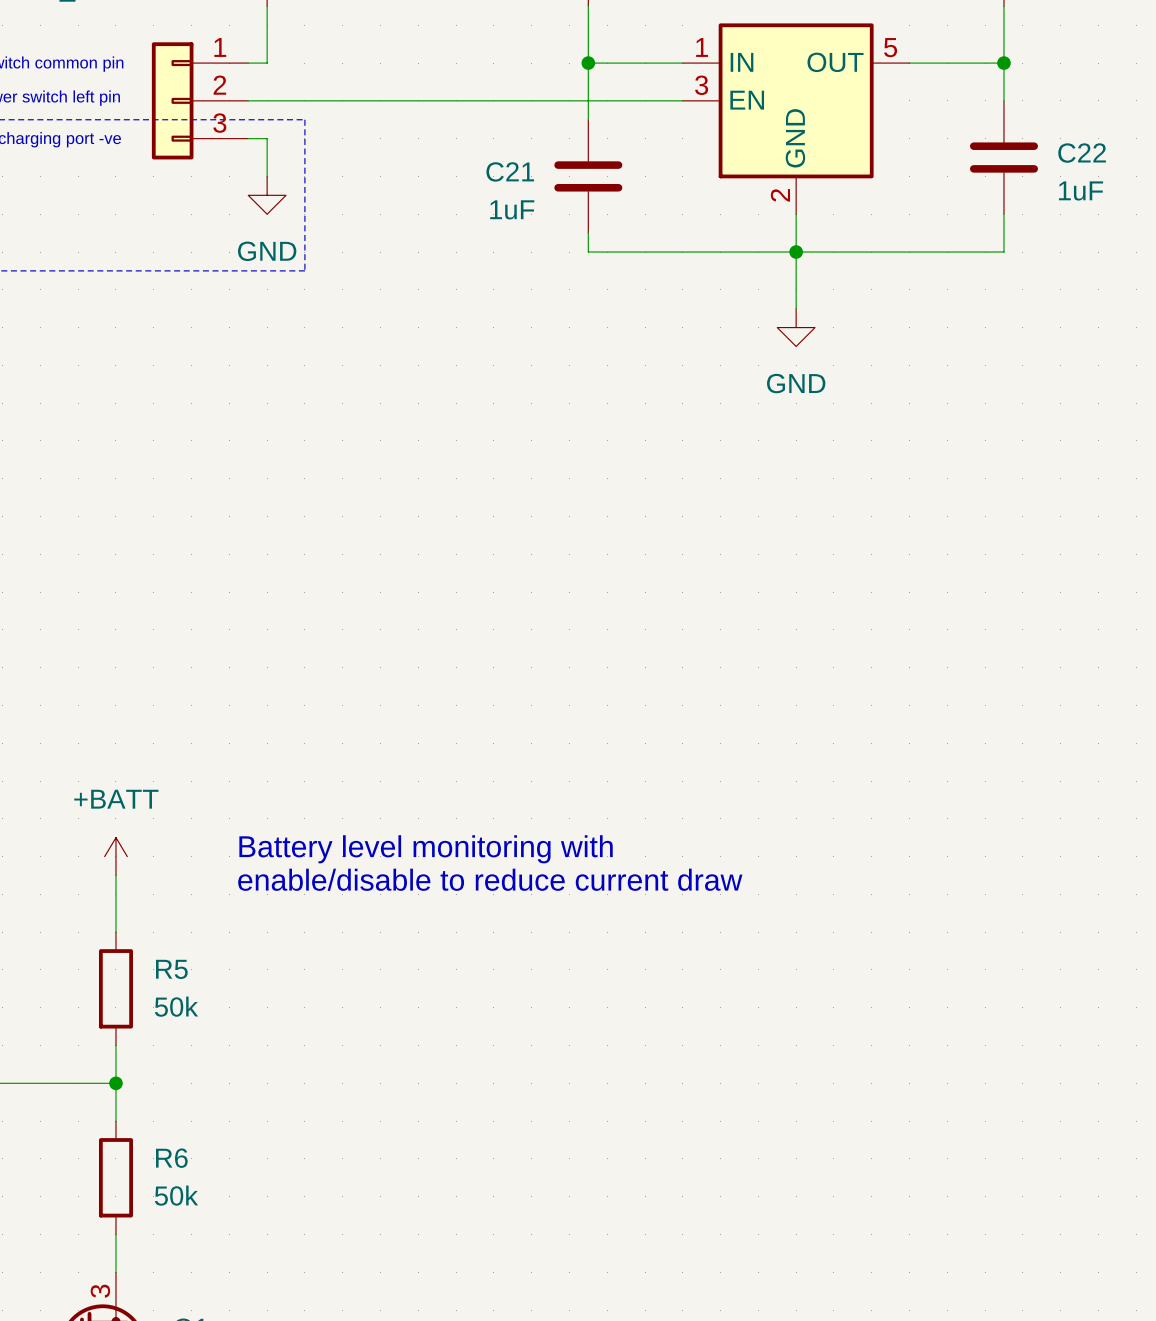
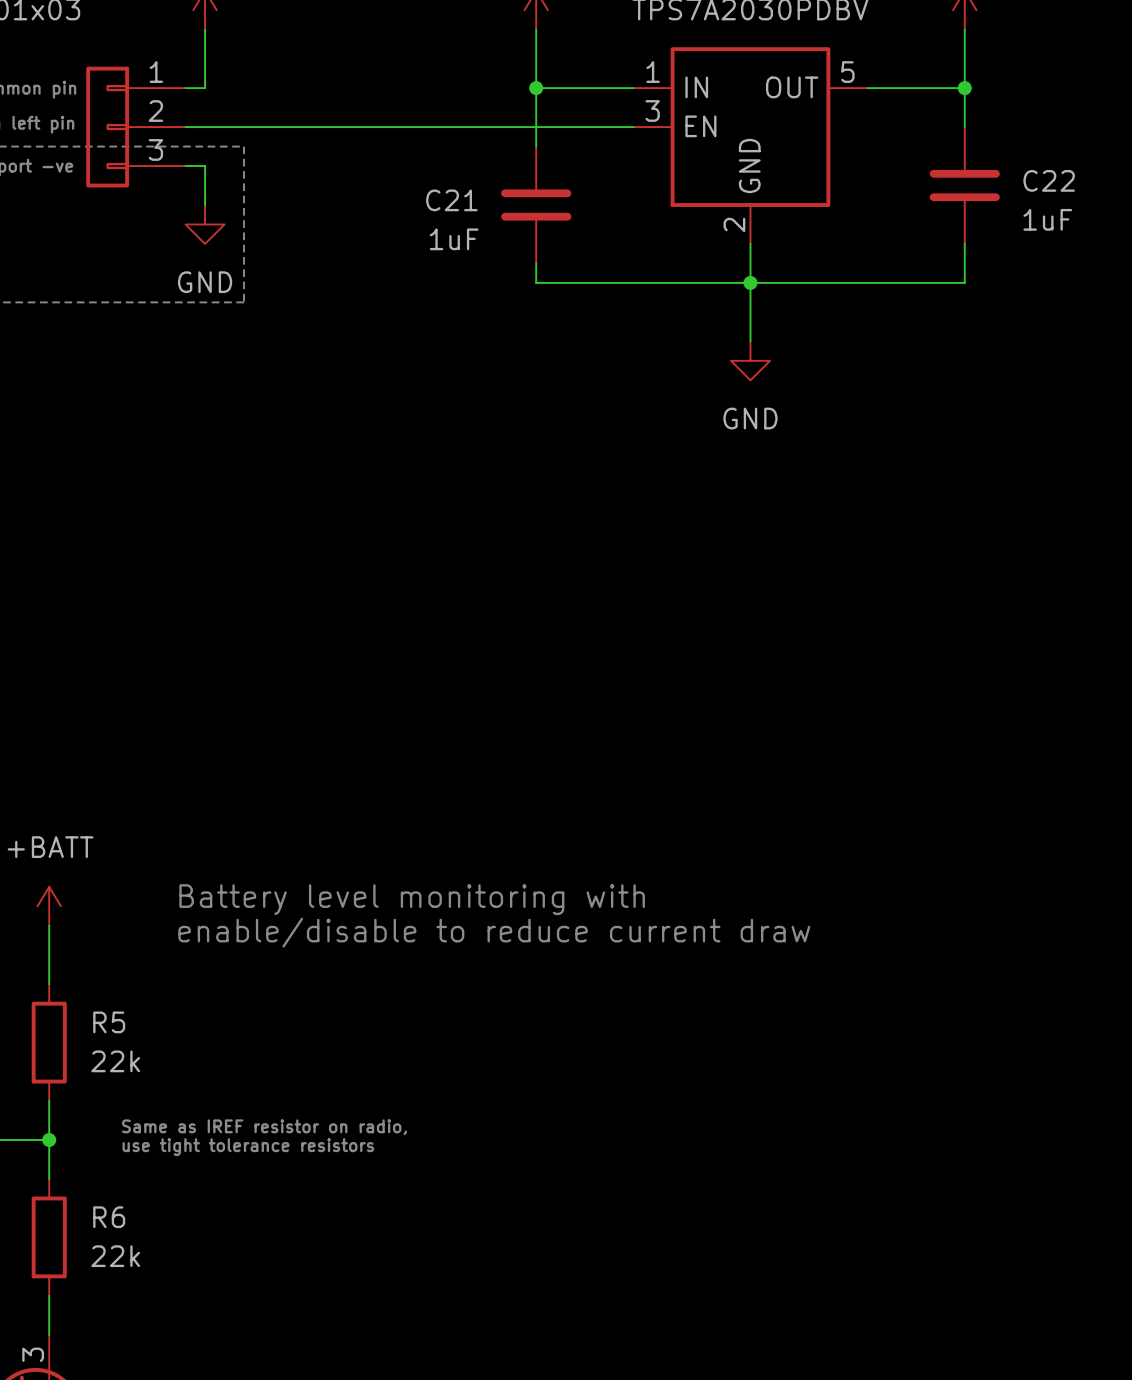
R5 value: 50k (176, 1006) -> 22k (115, 1061)
text: none -> Same as IREF resistor on radio, (264, 1127)
text: none -> use tight tolerance resistors (248, 1147)
R6 value: 50k (176, 1195) -> 22k (115, 1256)

